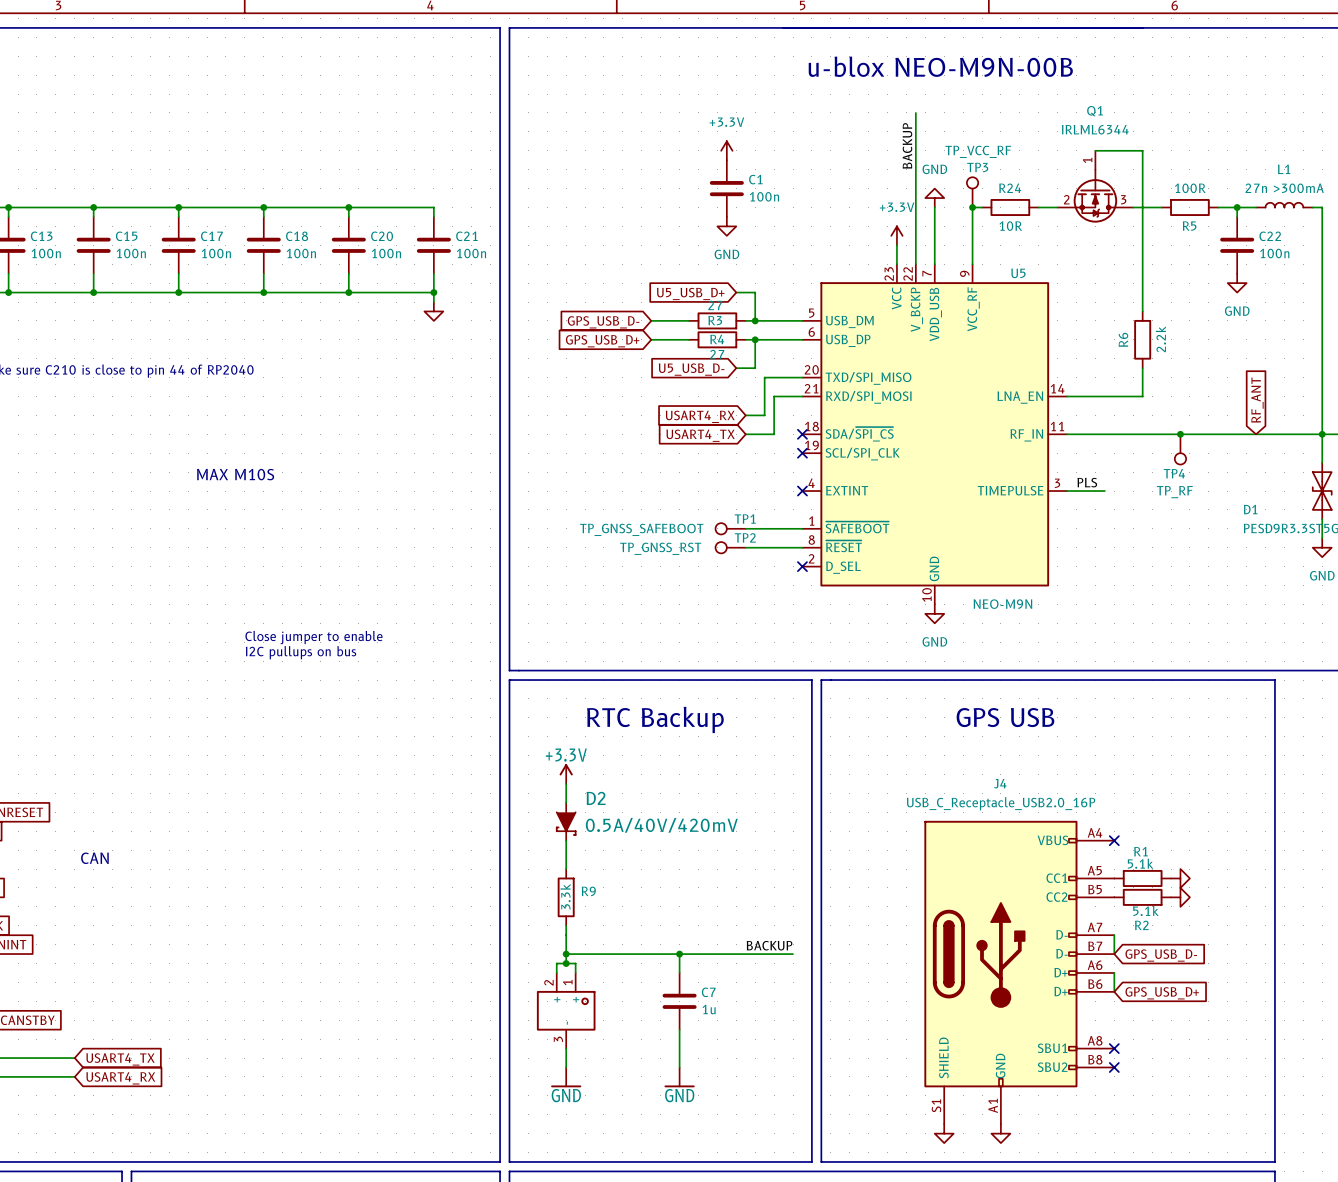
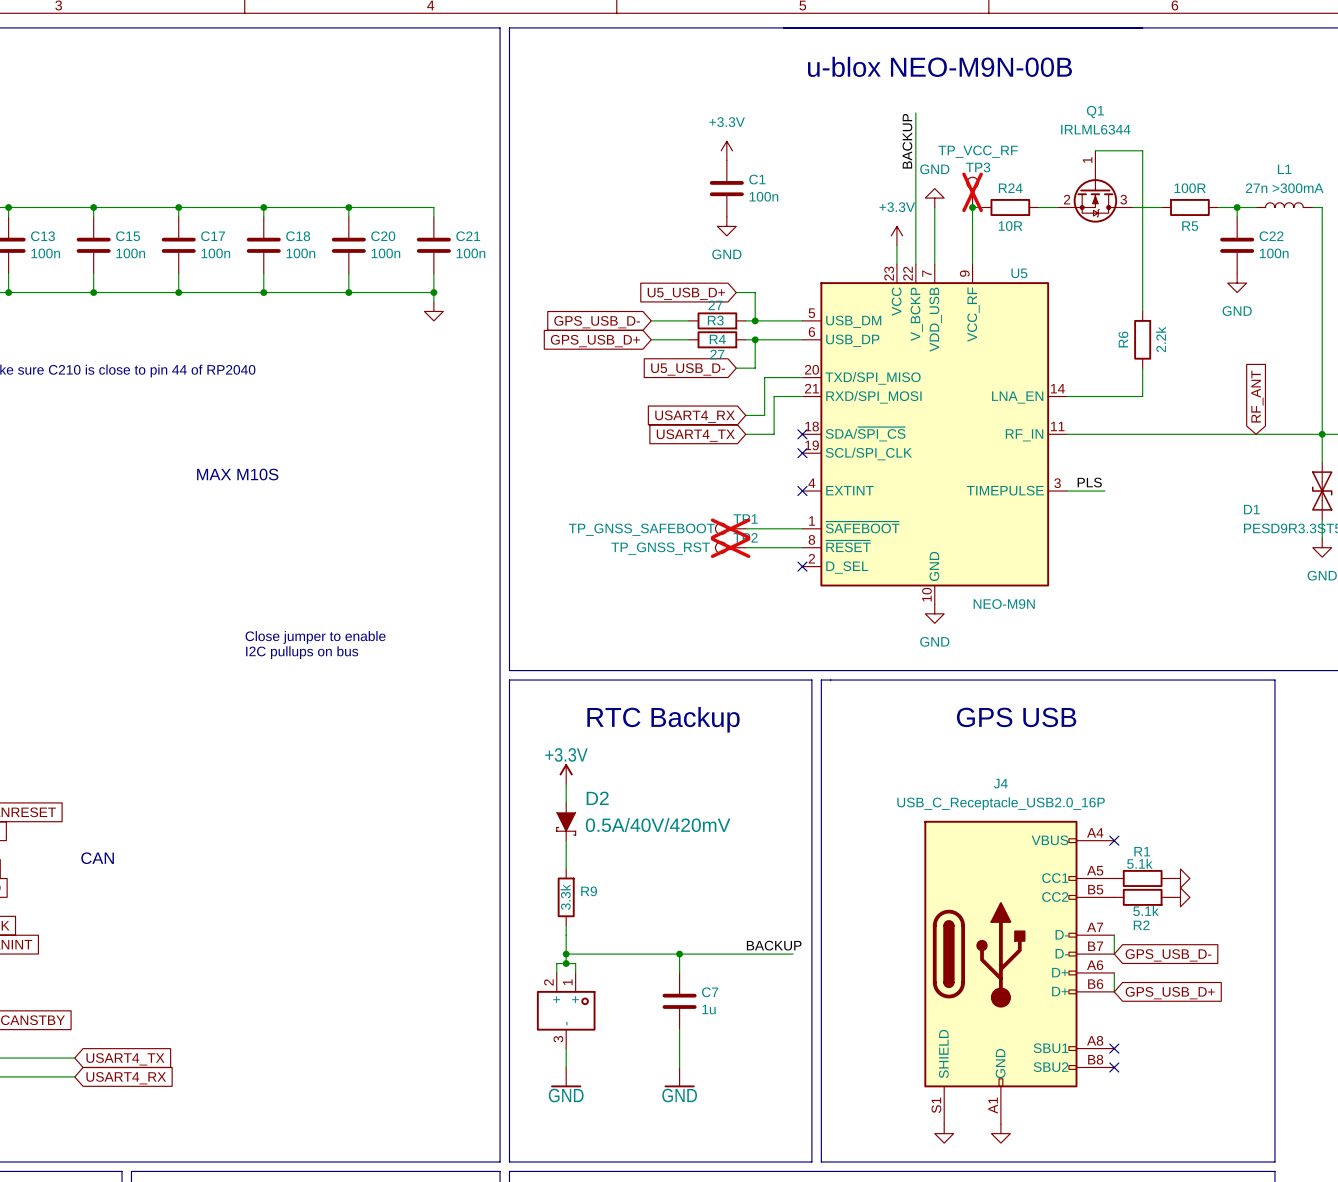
TP3 do-not-place cross: none -> (972, 192)
junction: (1180, 434) -> none
TP4: TP_RF (1180, 449) -> none
TP1 do-not-place cross: none -> (730, 528)
TP2 do-not-place cross: none -> (730, 547)

